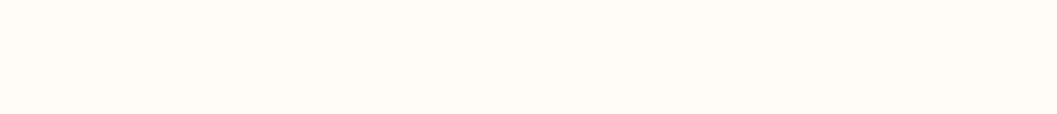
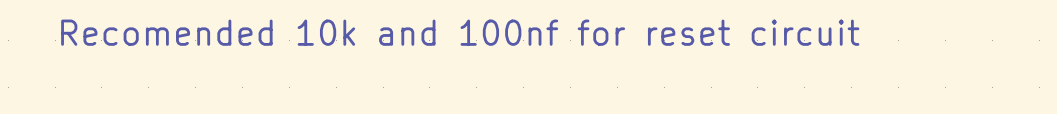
text: none -> Recomended 10k and 100nf for reset circuit (460, 32)

